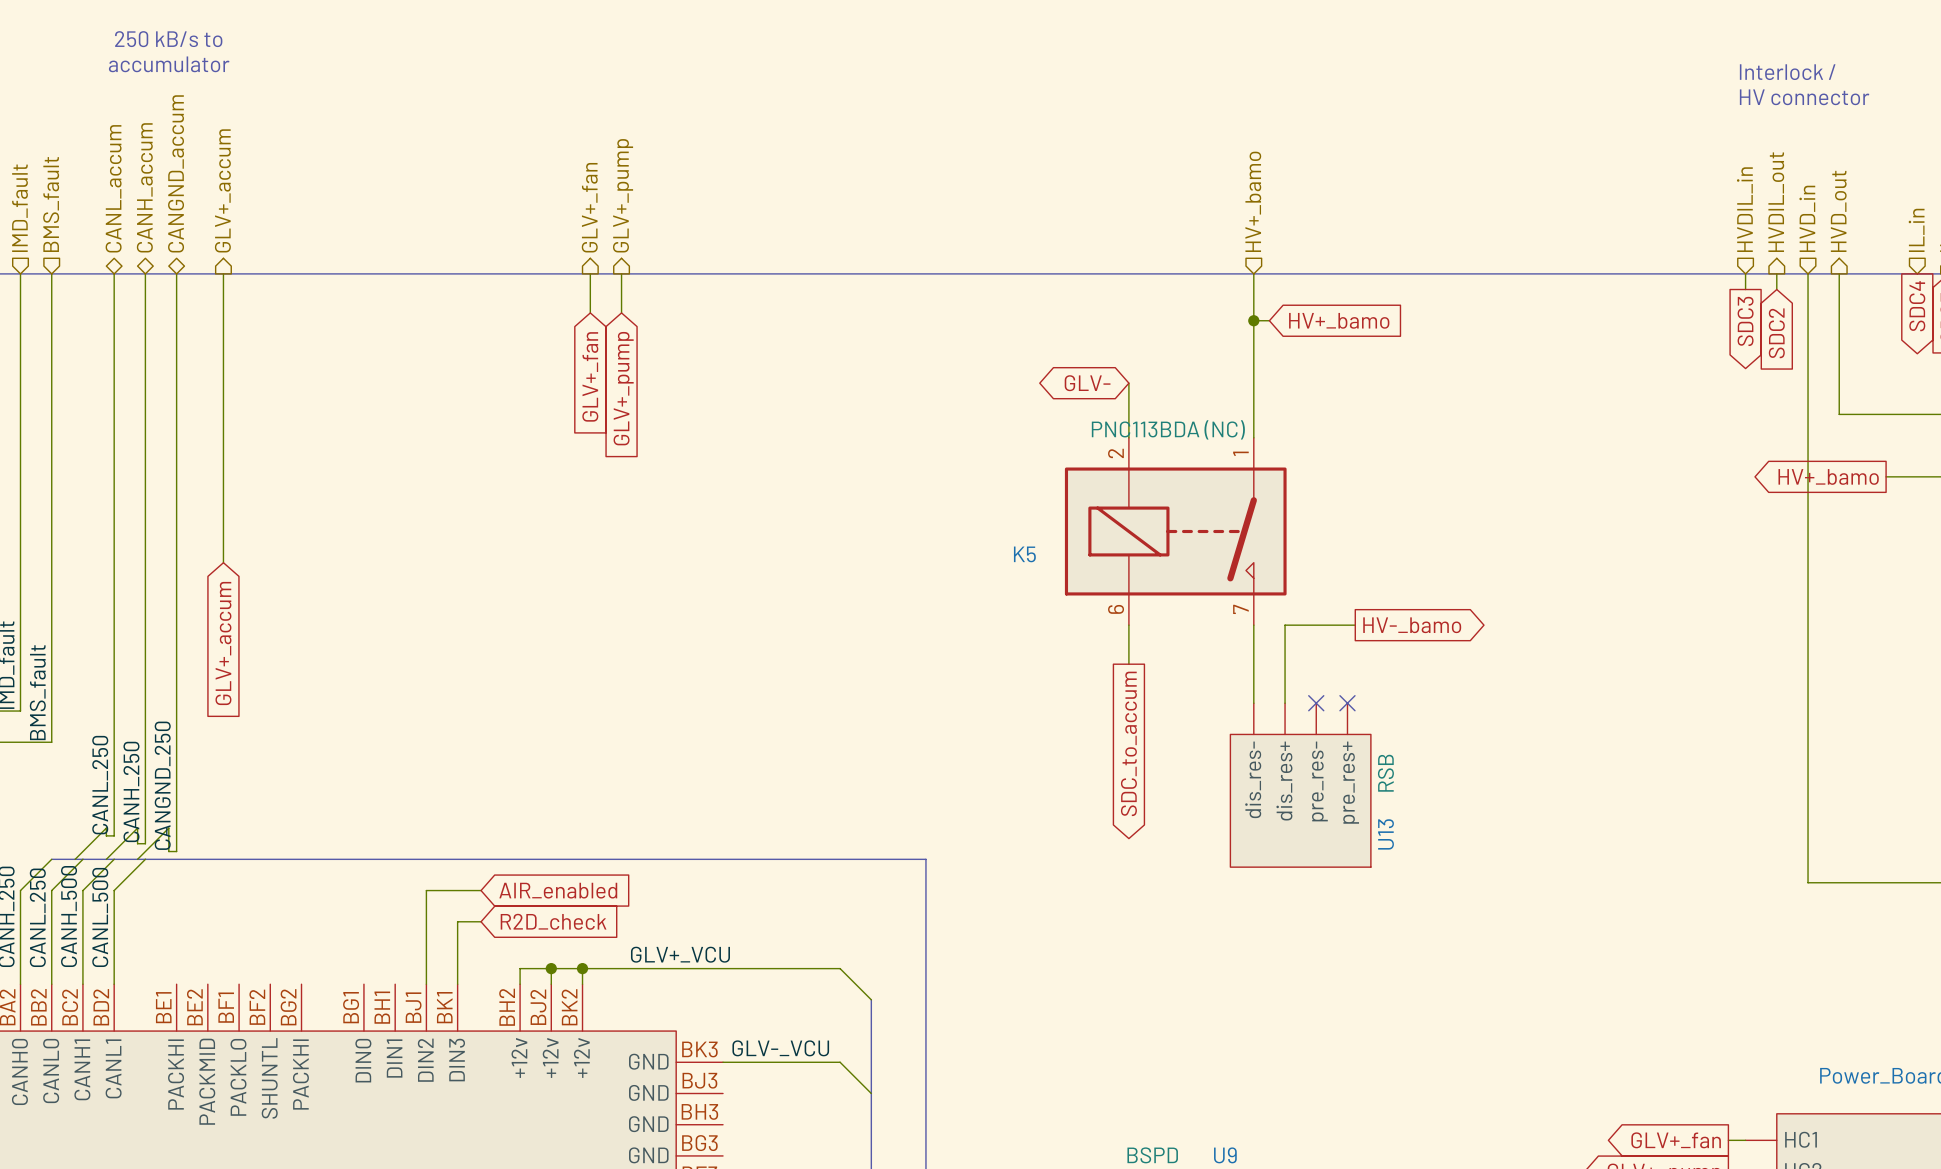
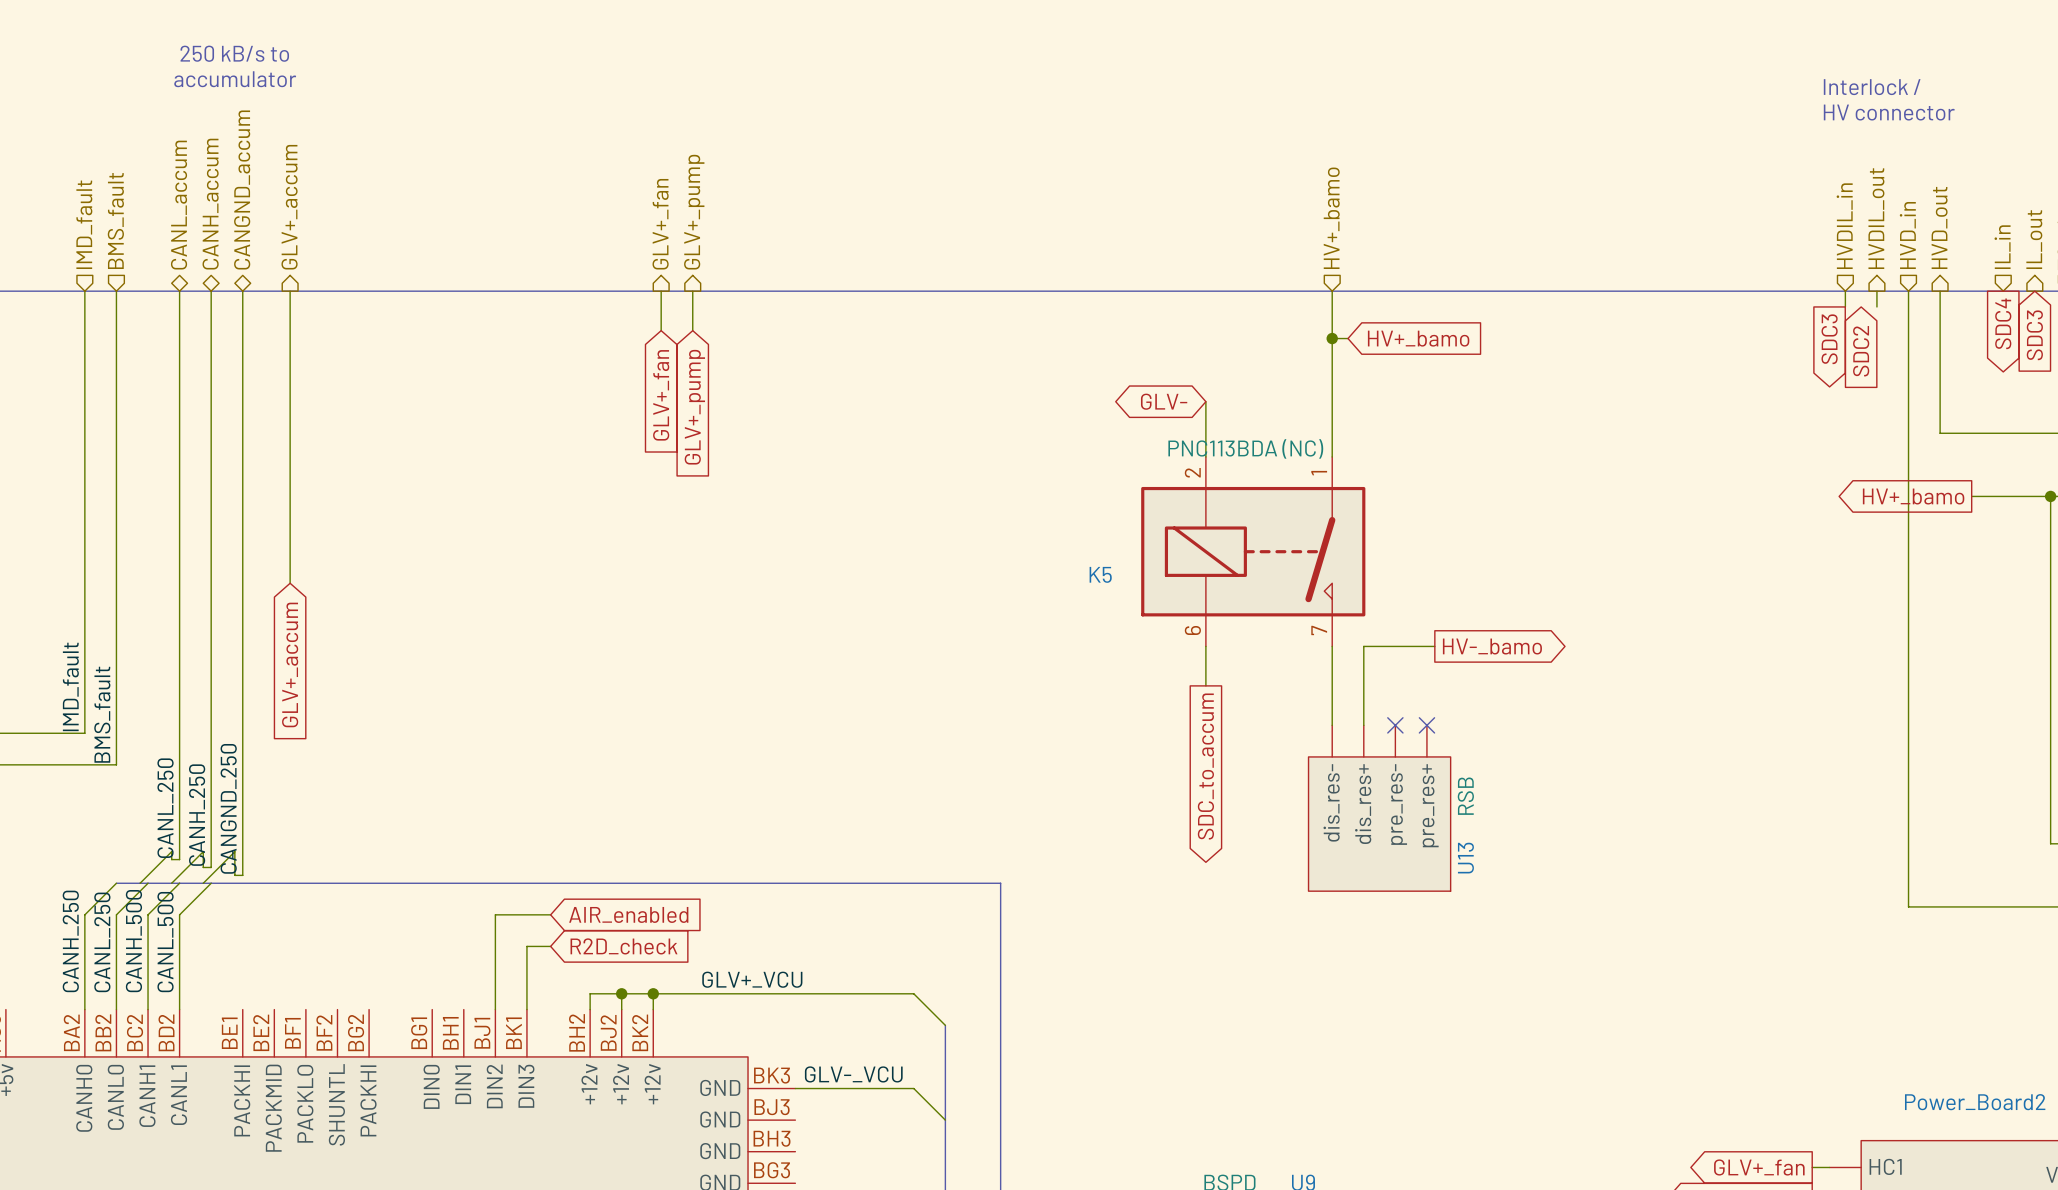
hierarchical label position: HVDIL_out (1776, 202) -> HVDIL_out (1876, 218)
hierarchical label position: HVDIL_in (1744, 209) -> HVDIL_in (1844, 226)
hierarchical label position: HVD_out (1838, 211) -> HVD_out (1939, 227)
hierarchical label position: HVD_in (1807, 218) -> HVD_in (1907, 235)
wire: (1745, 273) (1745, 289) -> (1845, 291) (1845, 306)
wire: (1776, 273) (1776, 289) -> (1876, 291) (1876, 306)
wire: (1808, 273) (1808, 882) (1823, 882) -> (1908, 291) (1908, 906)
wire: (1839, 273) (1839, 414) (1854, 414) -> (1940, 291) (1940, 433)

